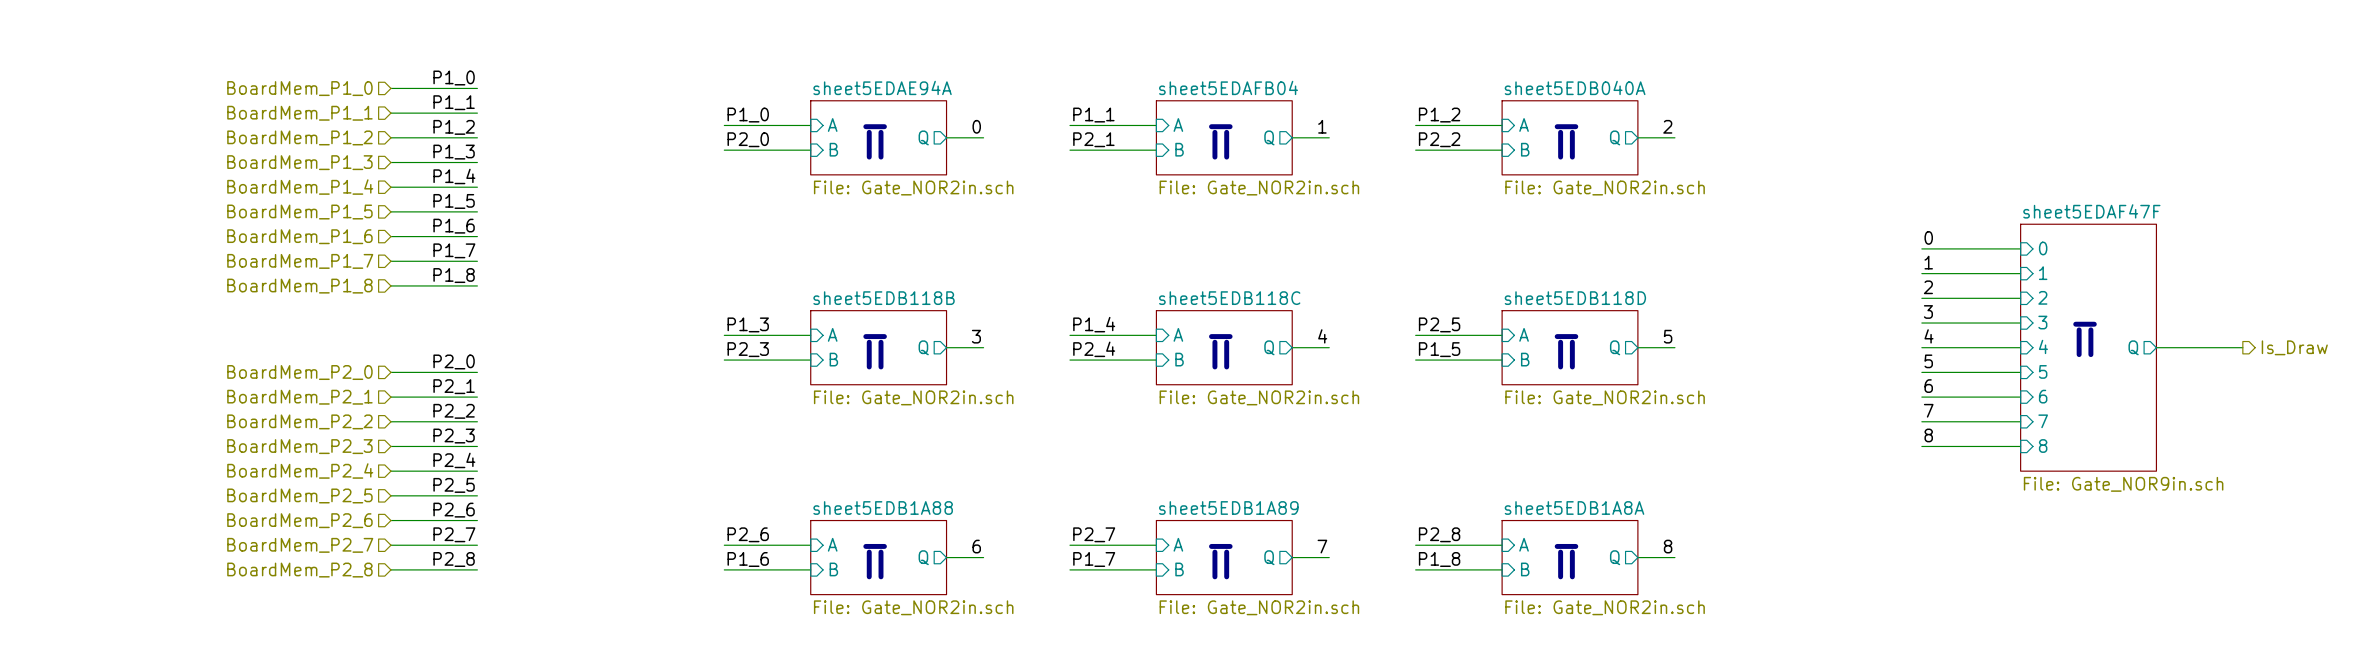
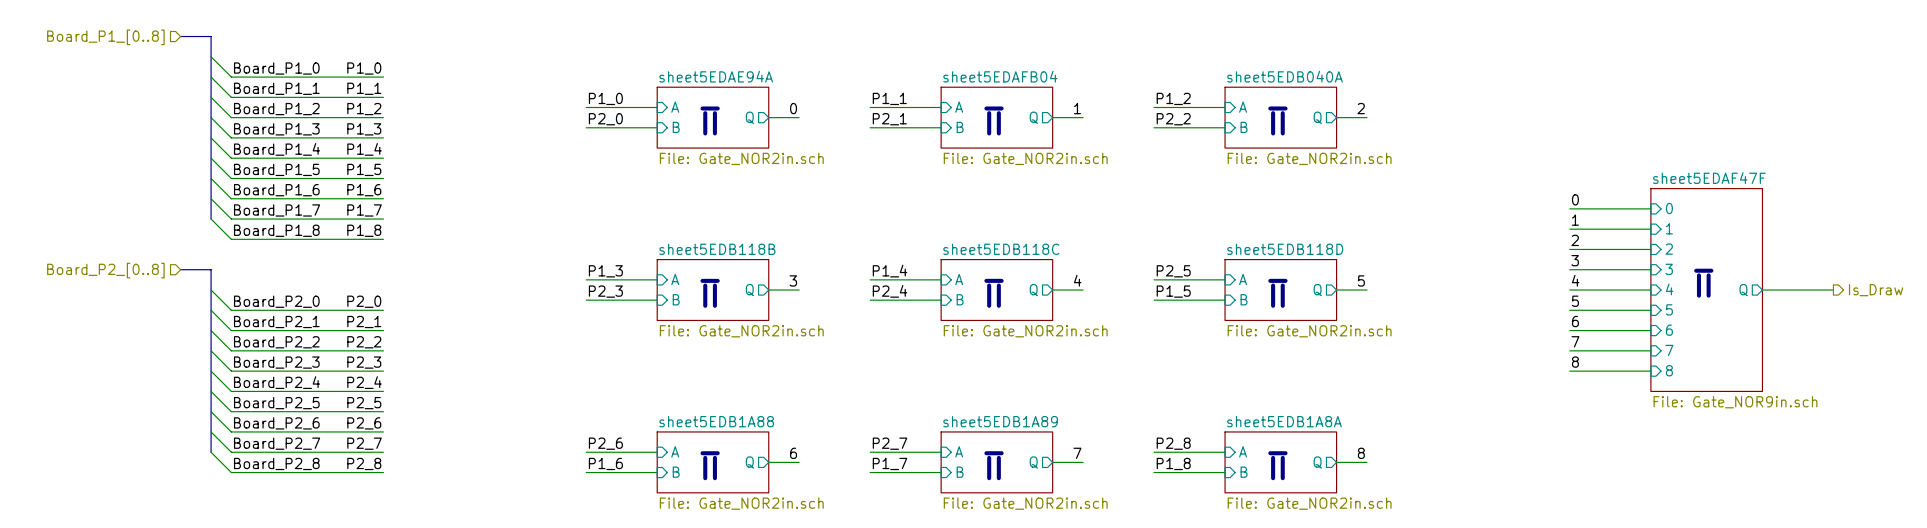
bus: none -> (180, 36) (211, 36) (211, 219)
hierarchical label: none -> Board_P1_[0..8] (105, 37)
wire: none -> (211, 56) (231, 77) (312, 77)
label: none -> Board_P1_0 (276, 68)
wire: none -> (211, 77) (231, 97) (312, 97)
hierarchical label: BoardMem_P1_0 (299, 88) -> none
label: none -> Board_P1_1 (276, 88)
wire: none -> (211, 97) (231, 117) (312, 117)
hierarchical label: BoardMem_P1_1 (299, 113) -> none
label: none -> Board_P1_2 (276, 109)
wire: none -> (211, 117) (231, 137) (312, 137)
hierarchical label: BoardMem_P1_2 (299, 137) -> none
label: none -> Board_P1_3 (276, 129)
wire: none -> (211, 137) (231, 158) (312, 158)
hierarchical label: BoardMem_P1_3 (299, 162) -> none
label: none -> Board_P1_4 (277, 149)
wire: none -> (211, 158) (231, 178) (312, 178)
hierarchical label: BoardMem_P1_4 (300, 187) -> none
label: none -> Board_P1_5 (276, 169)
wire: none -> (211, 178) (231, 198) (312, 198)
hierarchical label: BoardMem_P1_5 (299, 212) -> none
label: none -> Board_P1_6 (276, 190)
wire: none -> (211, 198) (231, 219) (312, 219)
hierarchical label: BoardMem_P1_6 (299, 236) -> none
label: none -> Board_P1_7 (277, 210)
wire: none -> (211, 219) (231, 239) (312, 239)
hierarchical label: BoardMem_P1_7 (300, 261) -> none
label: none -> Board_P1_8 (276, 230)
hierarchical label: BoardMem_P1_8 (299, 286) -> none
bus: none -> (180, 269) (211, 269) (211, 452)
hierarchical label: none -> Board_P2_[0..8] (105, 270)
wire: none -> (211, 290) (231, 310) (312, 310)
label: none -> Board_P2_0 (276, 301)
wire: none -> (211, 310) (231, 330) (312, 330)
hierarchical label: BoardMem_P2_0 (299, 372) -> none
label: none -> Board_P2_1 (276, 322)
wire: none -> (211, 330) (231, 350) (312, 350)
hierarchical label: BoardMem_P2_1 (299, 397) -> none
label: none -> Board_P2_2 (276, 342)
wire: none -> (211, 350) (231, 371) (312, 371)
hierarchical label: BoardMem_P2_2 (299, 421) -> none
label: none -> Board_P2_3 (276, 362)
wire: none -> (211, 371) (231, 391) (312, 391)
hierarchical label: BoardMem_P2_3 (299, 446) -> none
label: none -> Board_P2_4 (277, 382)
hierarchical label: BoardMem_P2_4 (300, 470) -> none
wire: none -> (211, 391) (231, 411) (312, 411)
label: none -> Board_P2_5 (276, 403)
wire: none -> (211, 411) (231, 431) (312, 431)
hierarchical label: BoardMem_P2_5 (299, 495) -> none
label: none -> Board_P2_6 (276, 423)
wire: none -> (211, 431) (231, 452) (312, 452)
hierarchical label: BoardMem_P2_6 (299, 520) -> none
label: none -> Board_P2_7 (277, 443)
wire: none -> (211, 452) (231, 472) (312, 472)
hierarchical label: BoardMem_P2_7 (300, 545) -> none
label: none -> Board_P2_8 (276, 463)
hierarchical label: BoardMem_P2_8 (299, 570) -> none

